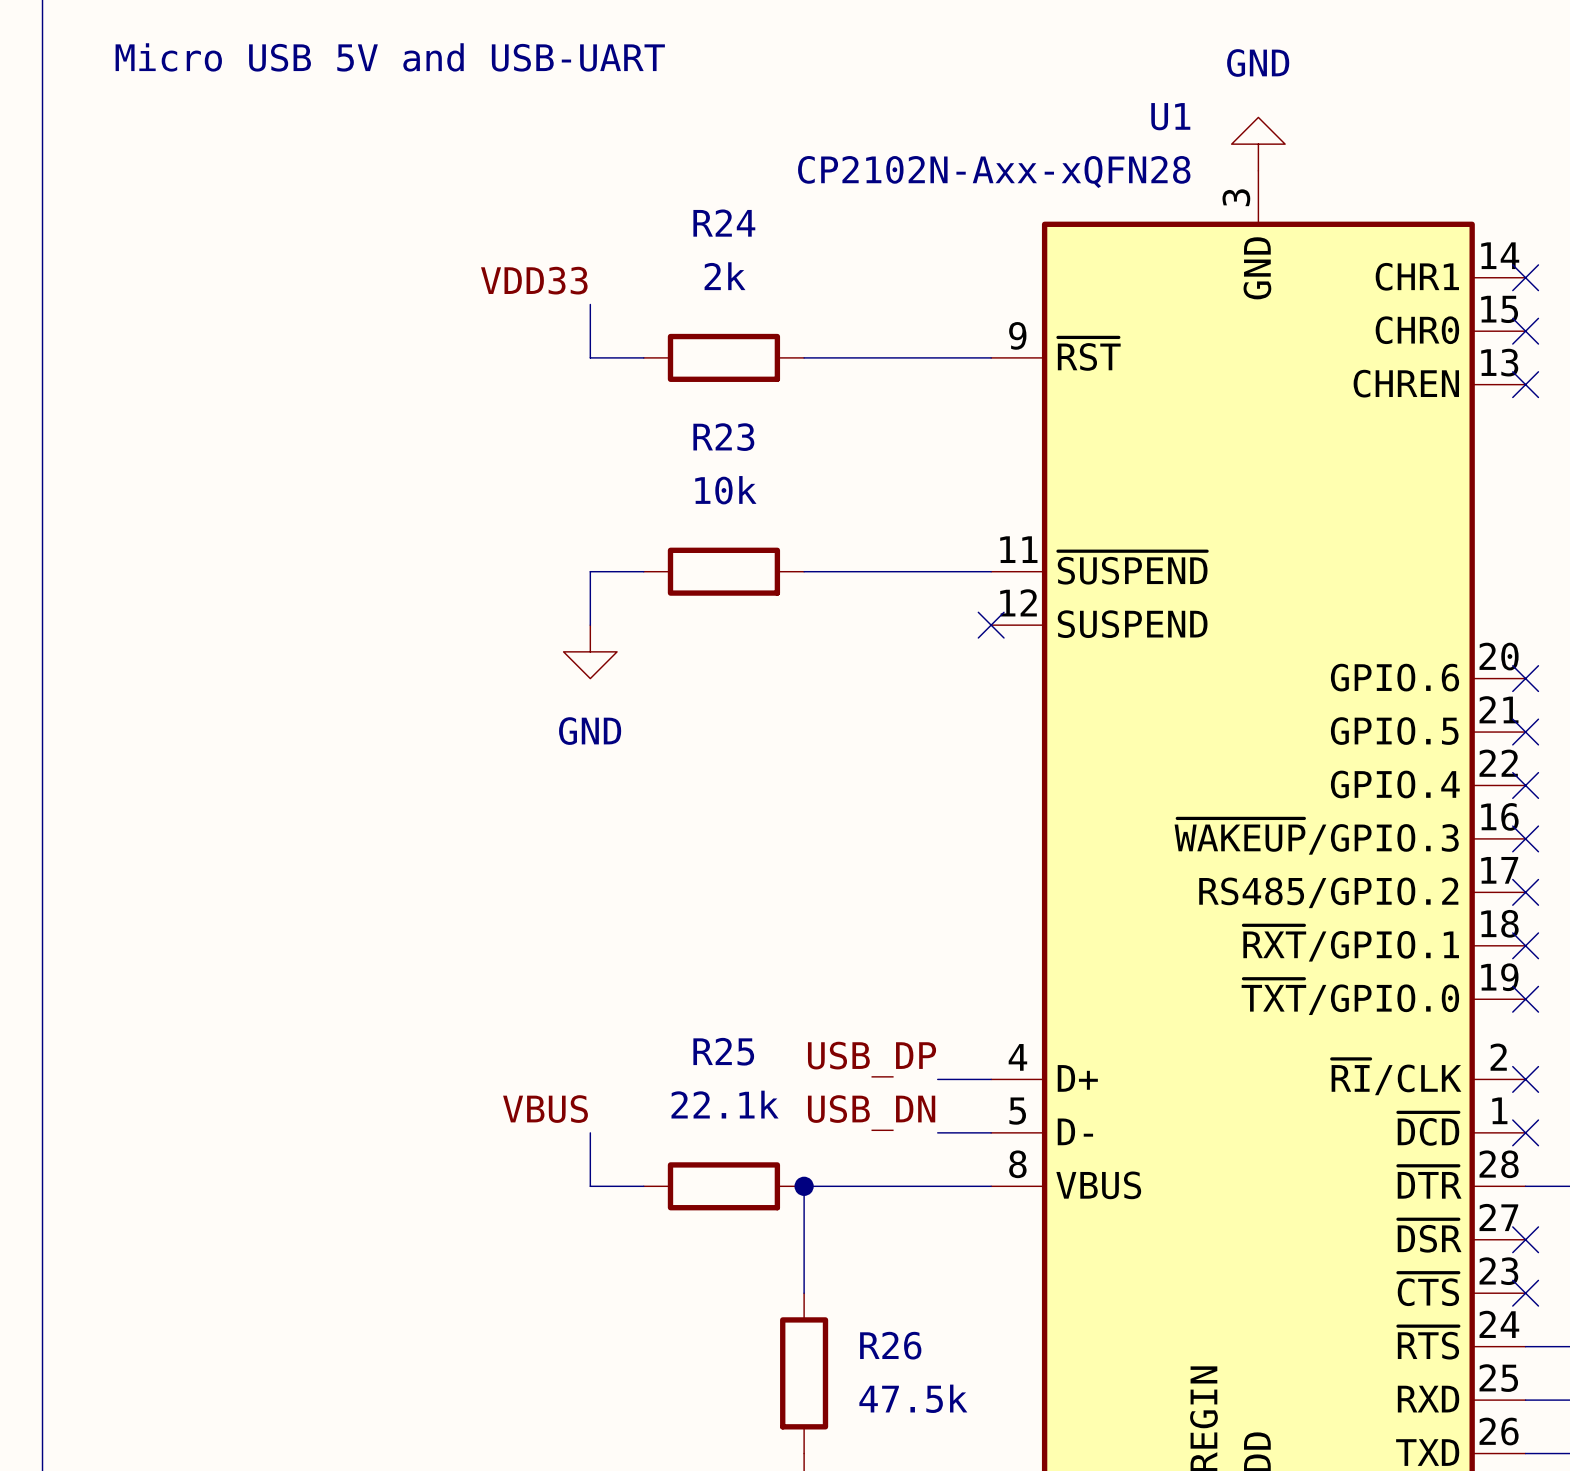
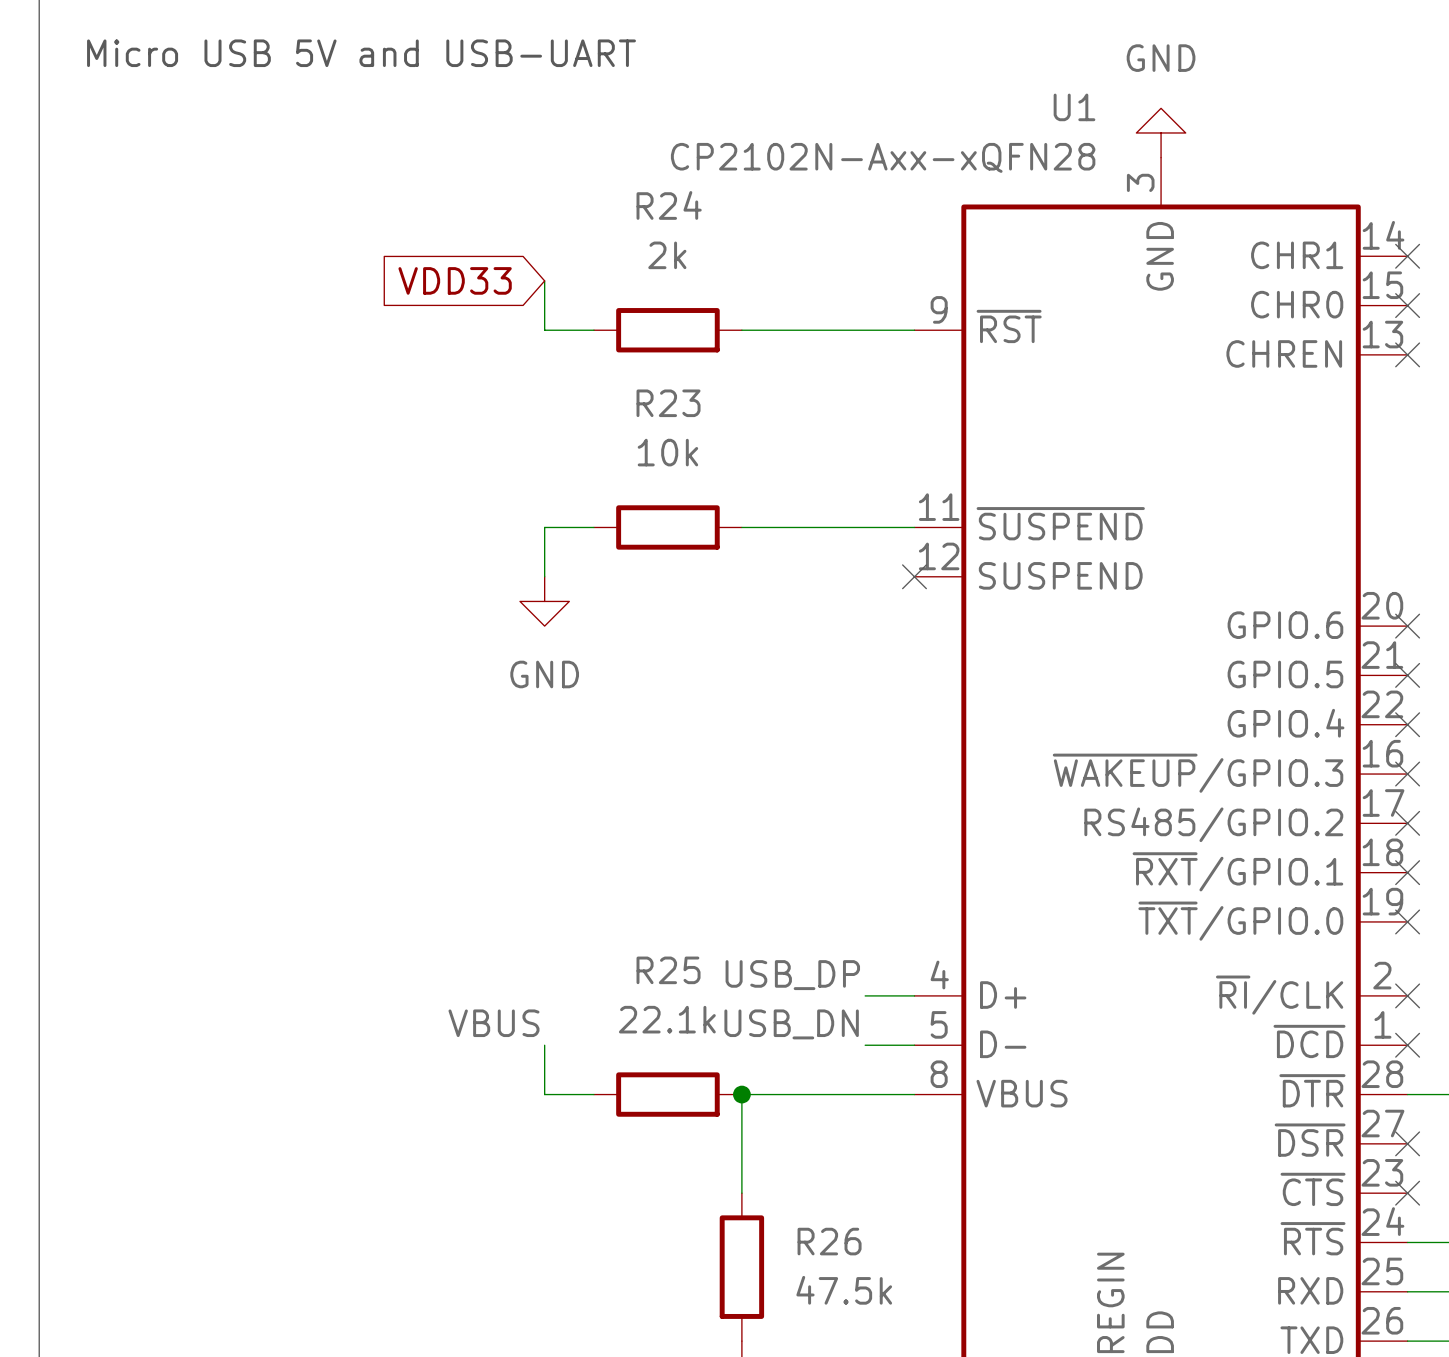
label: VDD33 (534, 280) -> none
global label: none -> VDD33 (455, 280)

